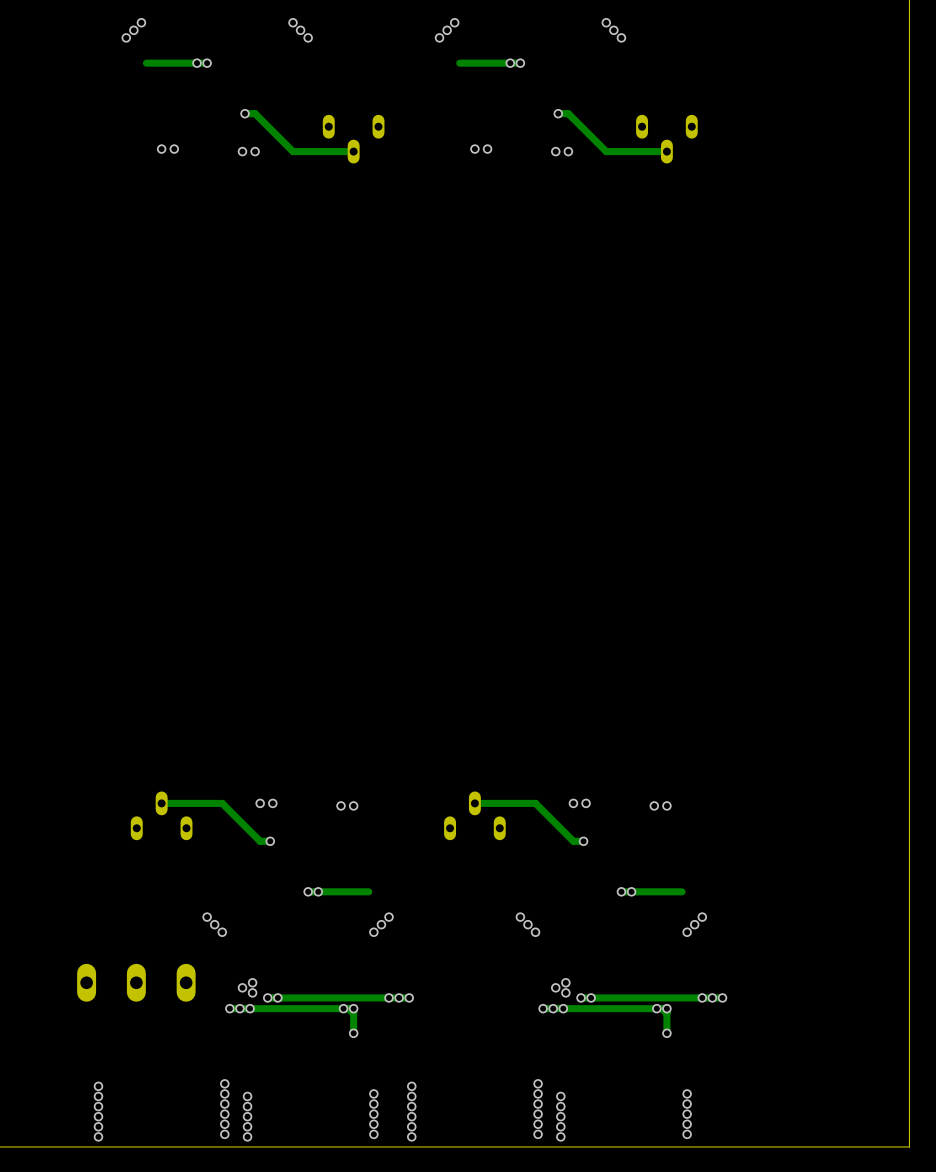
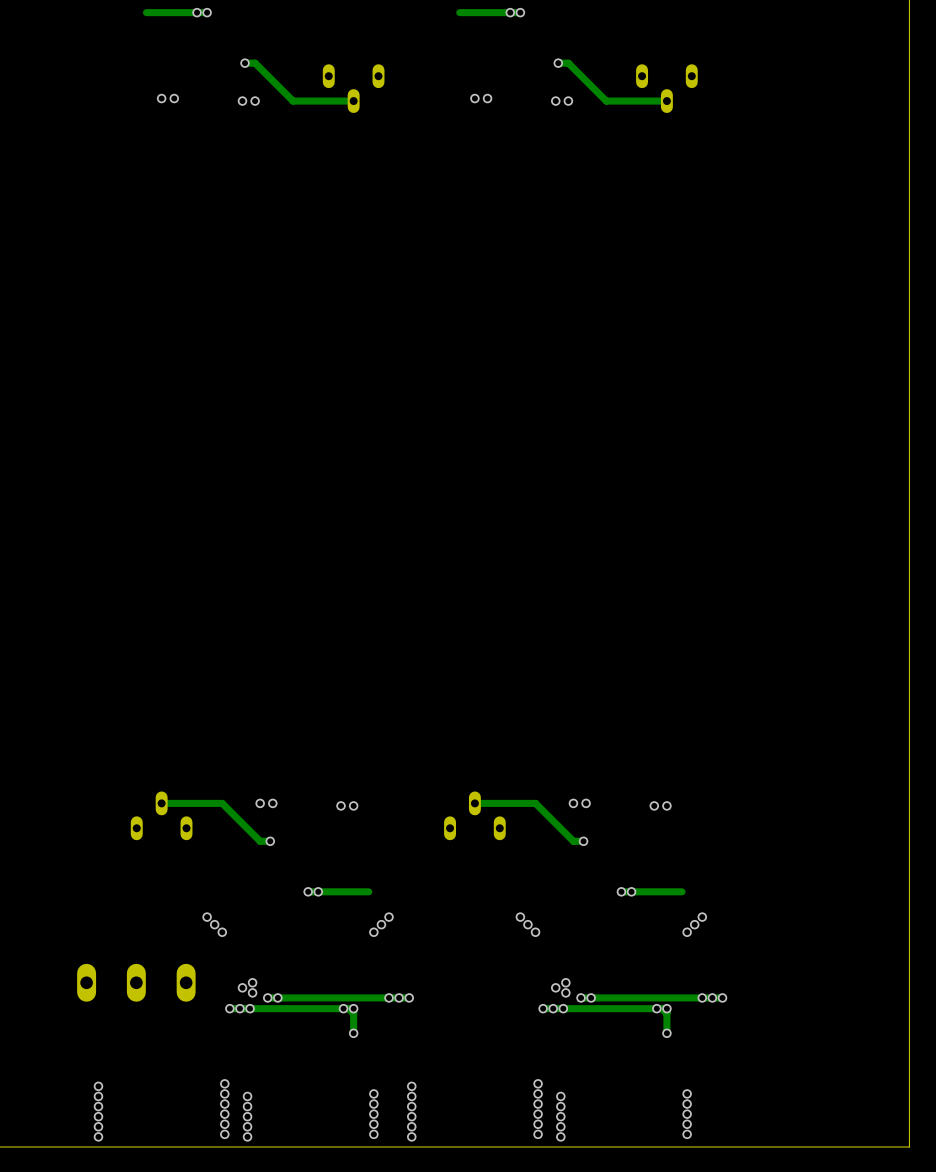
via: none -> (197, 12)
via: none -> (207, 12)
via: none -> (510, 12)
via: none -> (520, 12)
via: (141, 22) -> none
via: (293, 22) -> none
via: (454, 22) -> none
via: (606, 22) -> none
via: (133, 30) -> none
via: (300, 30) -> none
via: (447, 30) -> none
via: (613, 30) -> none
via: (126, 37) -> none
via: (308, 37) -> none
via: (439, 37) -> none
via: (621, 37) -> none
via: (197, 63) -> none
track: (207, 63) (146, 63) -> (207, 12) (146, 12)
via: (207, 63) -> none
via: none -> (245, 63)
via: (510, 63) -> none
track: (520, 63) (459, 63) -> (520, 12) (459, 12)
via: (520, 63) -> none
via: none -> (558, 63)
via: none -> (161, 98)
via: none -> (174, 98)
via: none -> (474, 98)
via: none -> (487, 98)
via: none -> (242, 101)
via: none -> (255, 101)
via: none -> (555, 101)
via: none -> (568, 101)
track: (245, 113) (255, 113) (293, 151) (353, 151) -> (245, 63) (255, 63) (293, 101) (353, 101)
via: (245, 113) -> none
track: (558, 113) (568, 113) (606, 151) (666, 151) -> (558, 63) (568, 63) (606, 101) (666, 101)
via: (558, 113) -> none
part position: (353, 139) -> (353, 88)
part position: (666, 139) -> (666, 88)
via: (161, 149) -> none
via: (174, 149) -> none
via: (474, 149) -> none
via: (487, 149) -> none
via: (242, 151) -> none
via: (255, 151) -> none
via: (555, 151) -> none
via: (568, 151) -> none

